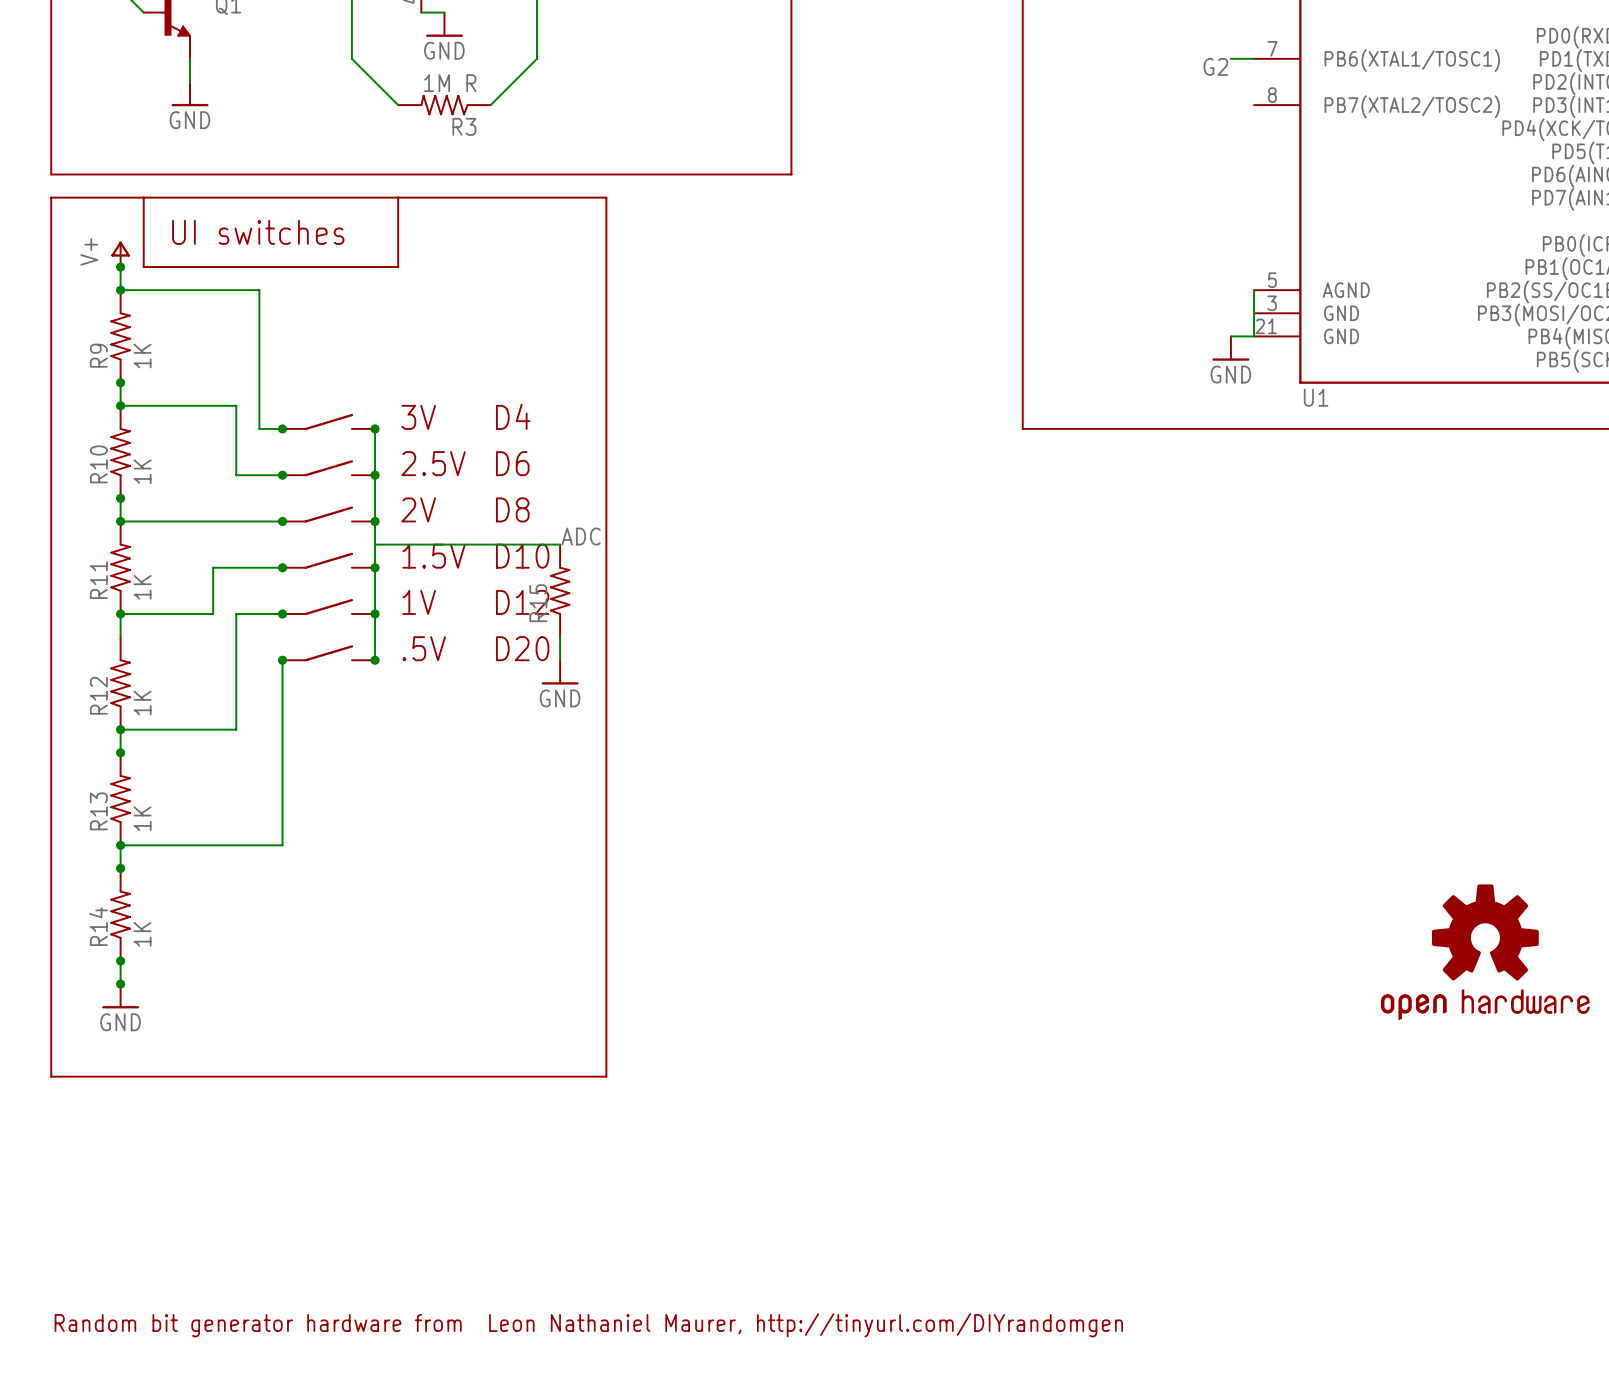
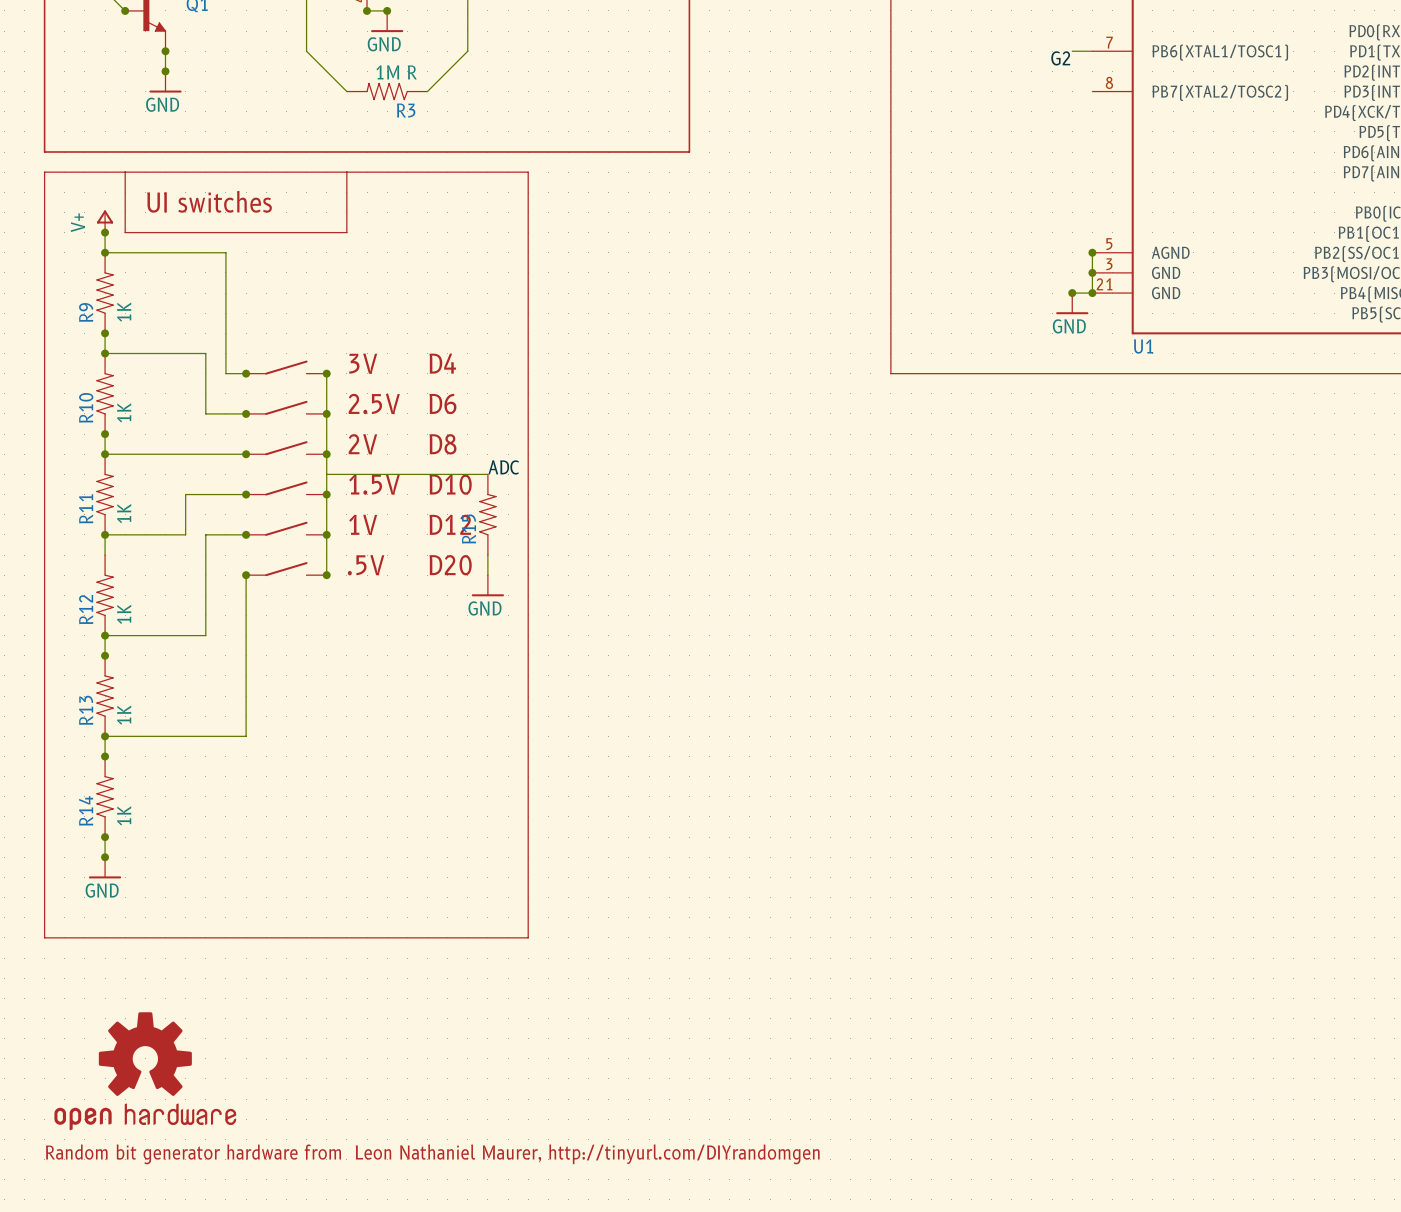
junction: none -> (125, 10)
junction: none -> (367, 10)
junction: none -> (387, 10)
junction: none -> (165, 51)
junction: none -> (165, 71)
junction: none -> (1092, 252)
junction: none -> (1092, 272)
junction: none -> (1072, 293)
junction: none -> (1092, 293)
part: (1485, 952) -> none
part: none -> (145, 1071)

